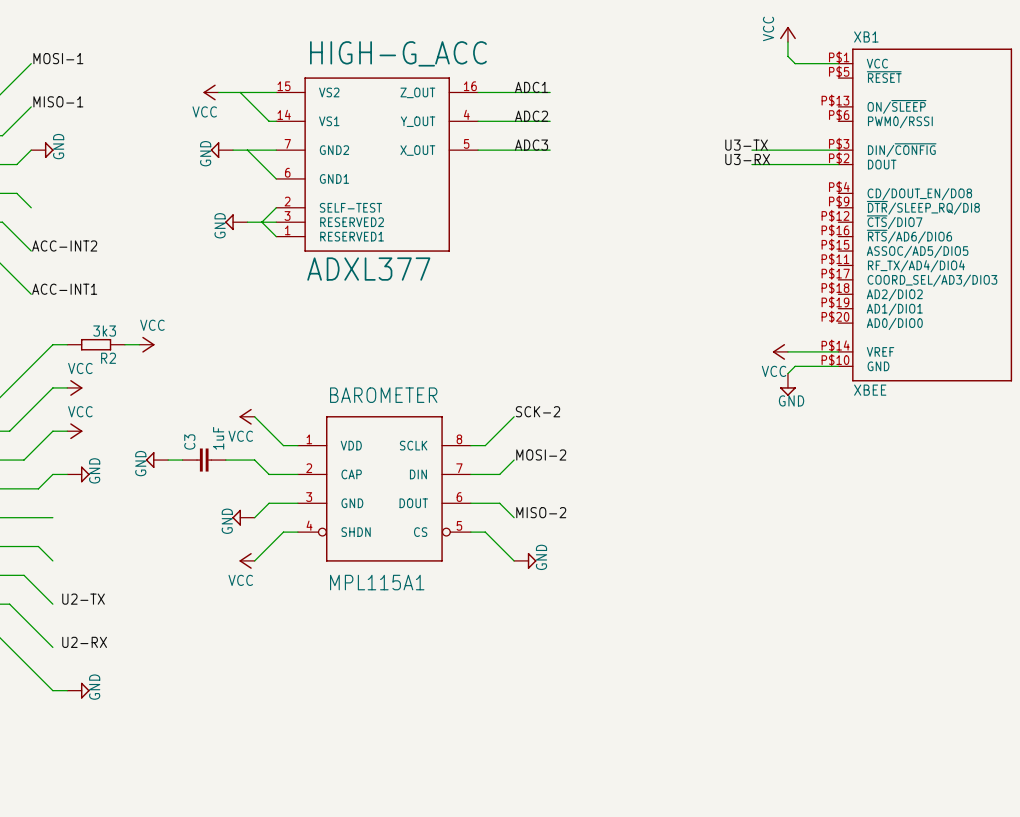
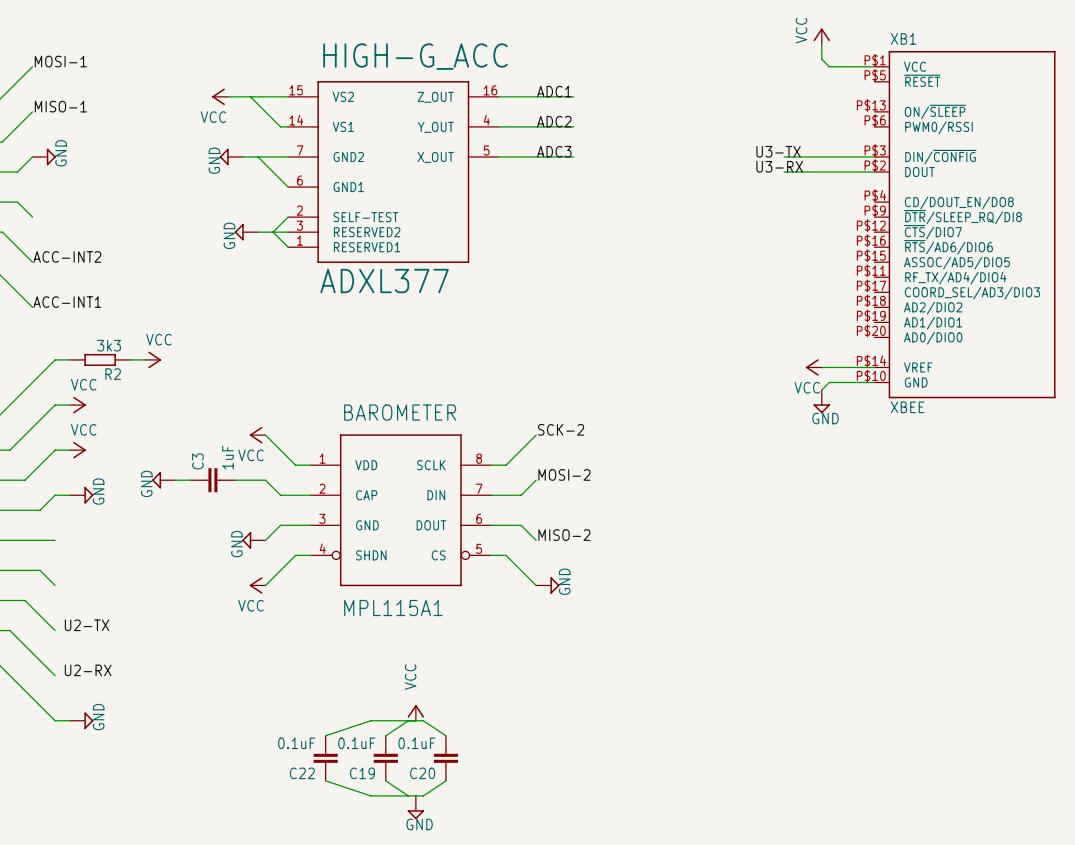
power symbol: none -> VCC (415, 712)
wire: none -> (408, 720) (385, 735)
wire: none -> (325, 735) (370, 720) (423, 720) (445, 735)
C22: none -> 0.1uF (325, 758)
C19: none -> 0.1uF (385, 758)
C20: none -> 0.1uF (445, 758)
wire: none -> (325, 780) (370, 795) (423, 795) (445, 780)
wire: none -> (385, 780) (408, 795)
power symbol: none -> GND (415, 807)

